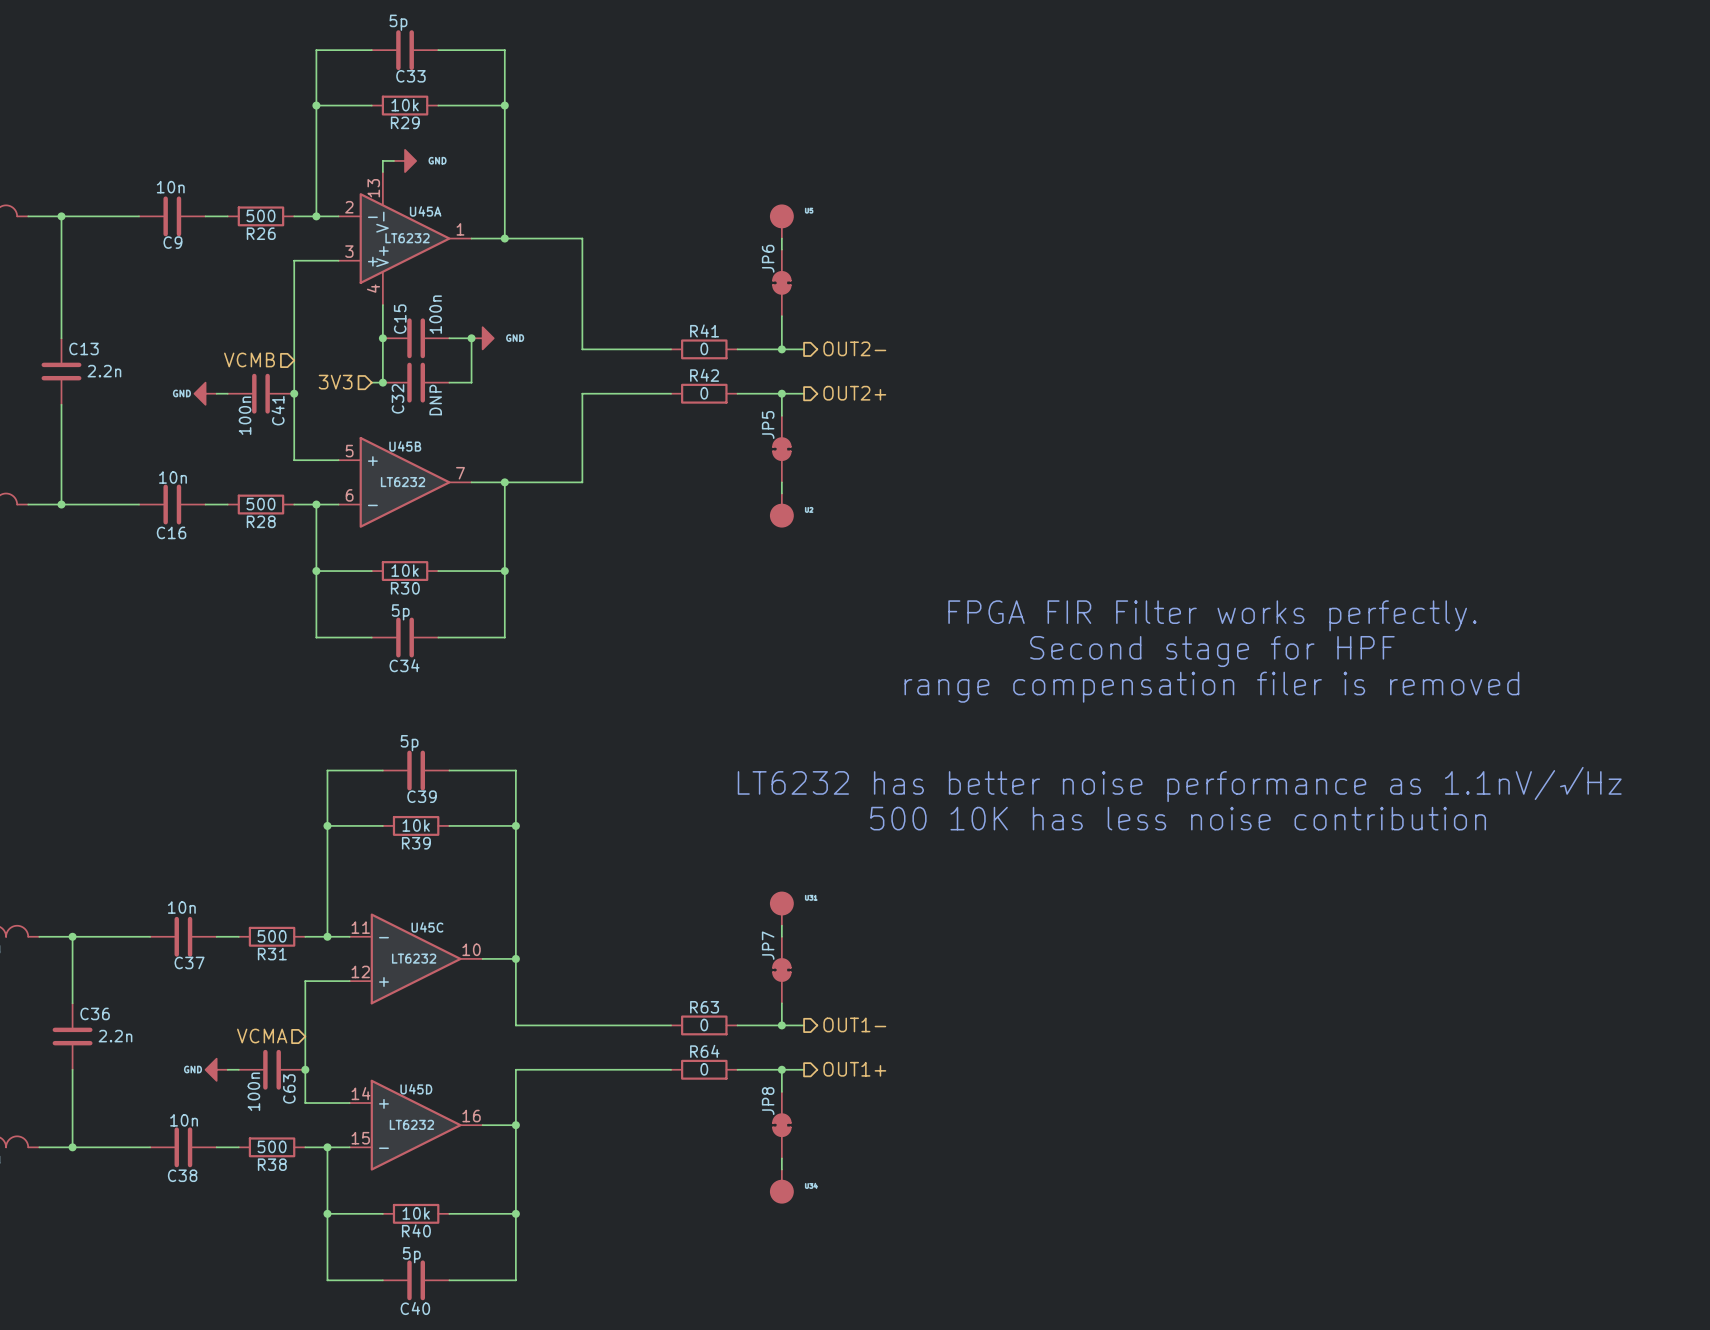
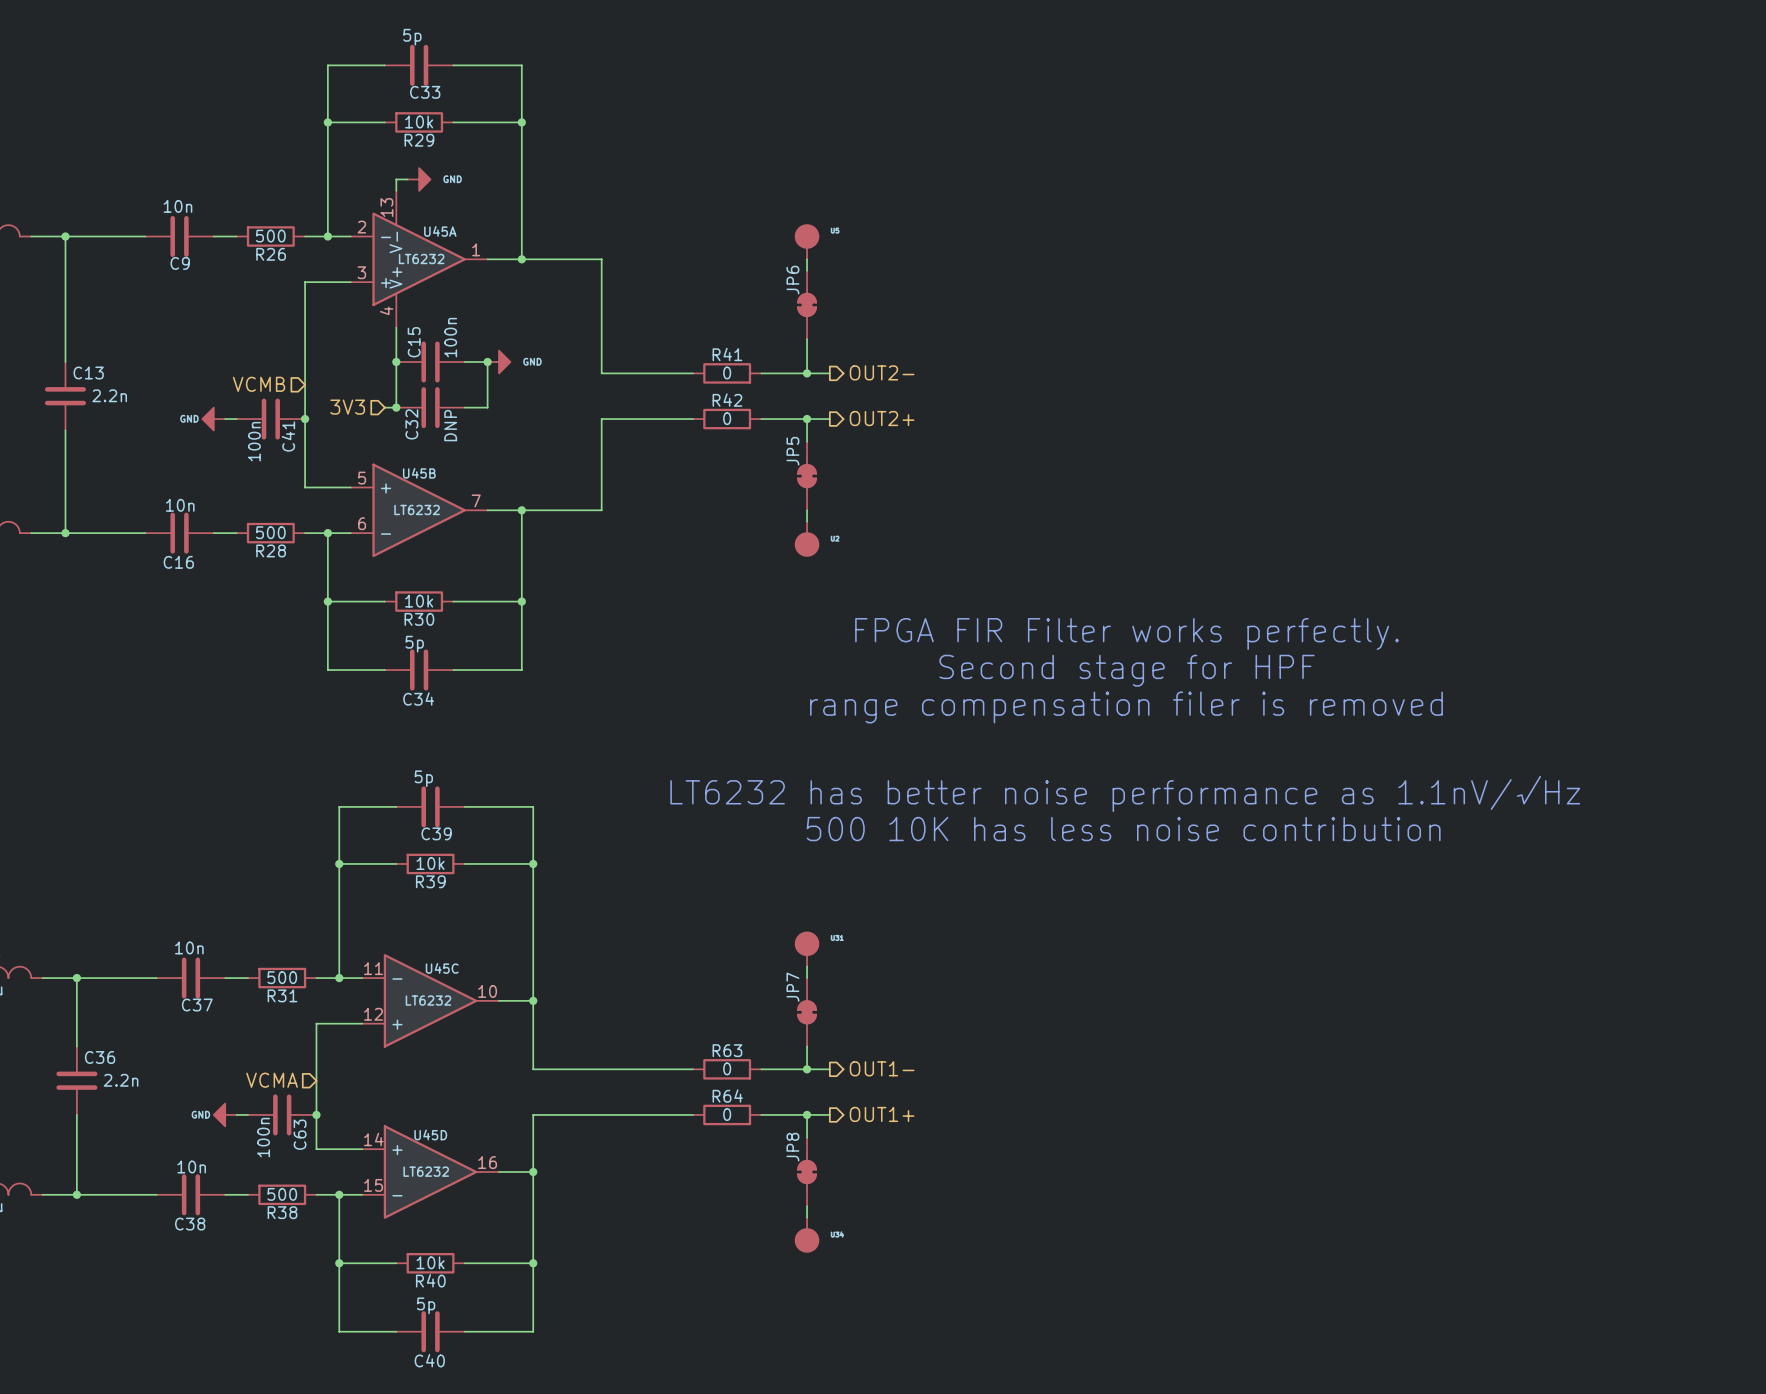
text position: FPGA FIR Filter works perfectly. (1212, 615) -> FPGA FIR Filter works perfectly. (1127, 633)
text position: Second stage for HPF (1212, 651) -> Second stage for HPF (1127, 670)
text position: range compensation filer is removed (1211, 687) -> range compensation filer is removed (1126, 707)
text position: LT6232 has better noise performance as 1.1nV/√Hz (1179, 784) -> LT6232 has better noise performance as 1.1nV/√Hz (1125, 793)
text position: 500 10K has less noise contribution (1178, 818) -> 500 10K has less noise contribution (1123, 829)

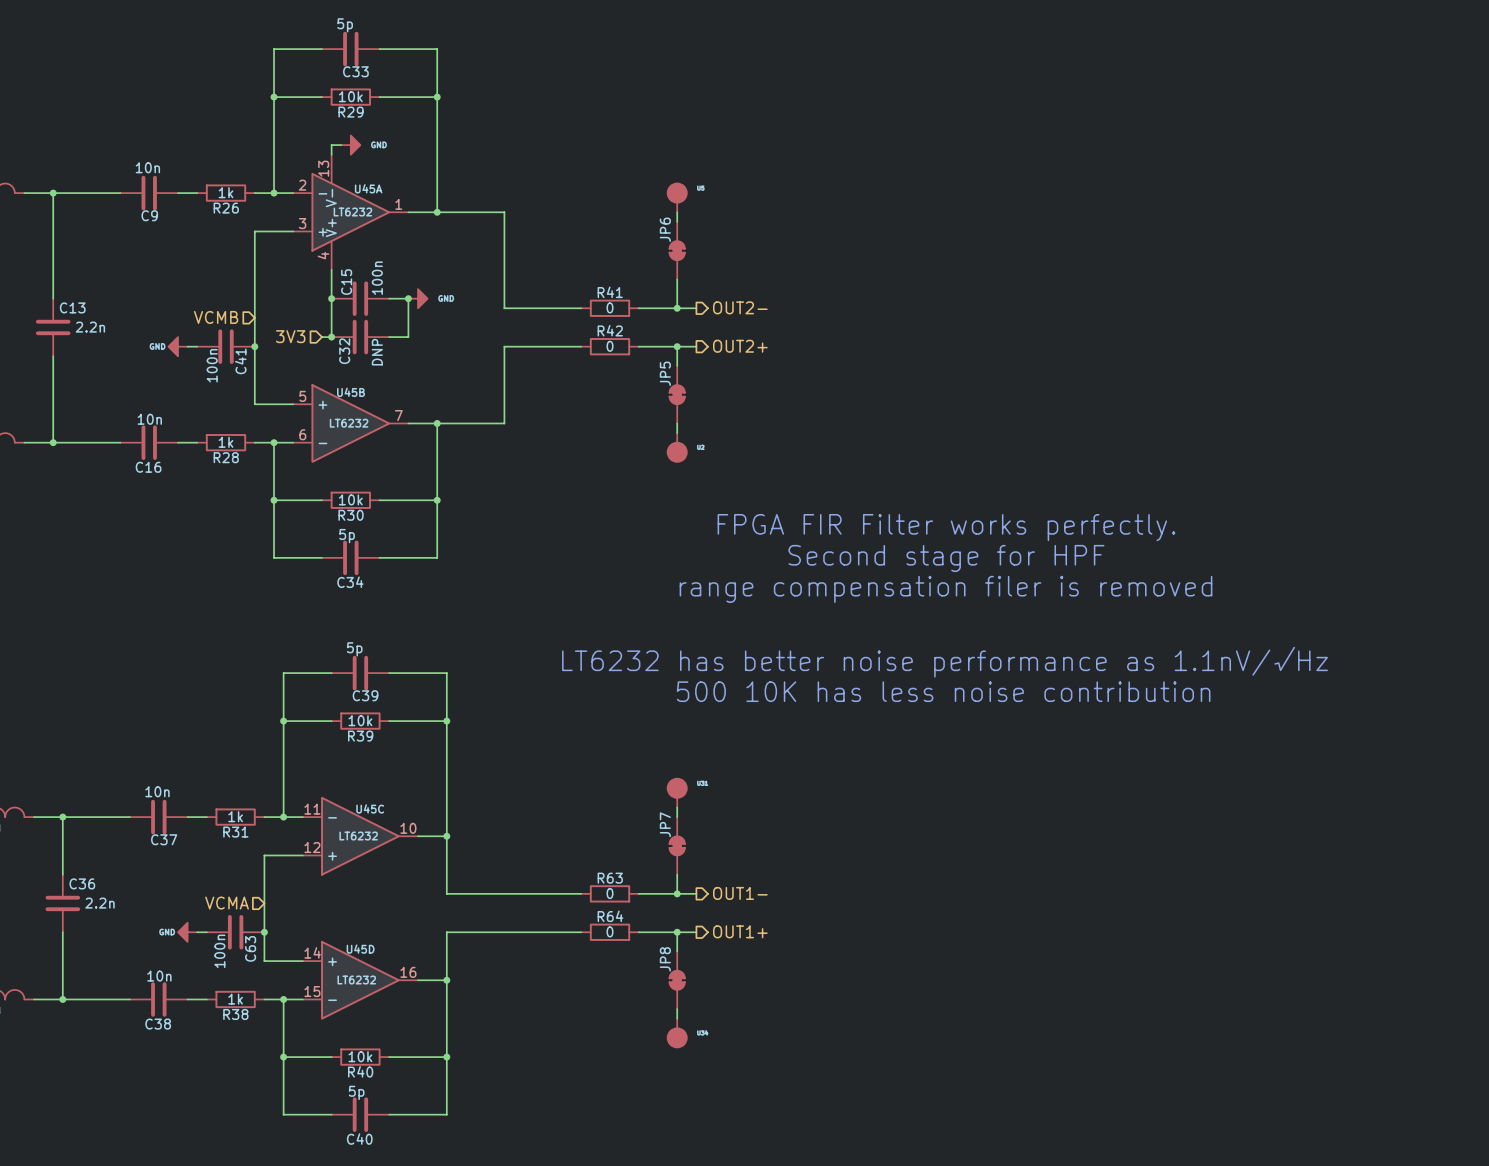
R26 value: 500 (270, 236) -> 1k (226, 192)
R28 value: 500 (270, 532) -> 1k (226, 442)
R31 value: 500 (282, 977) -> 1k (235, 816)
R38 value: 500 (282, 1194) -> 1k (235, 999)

